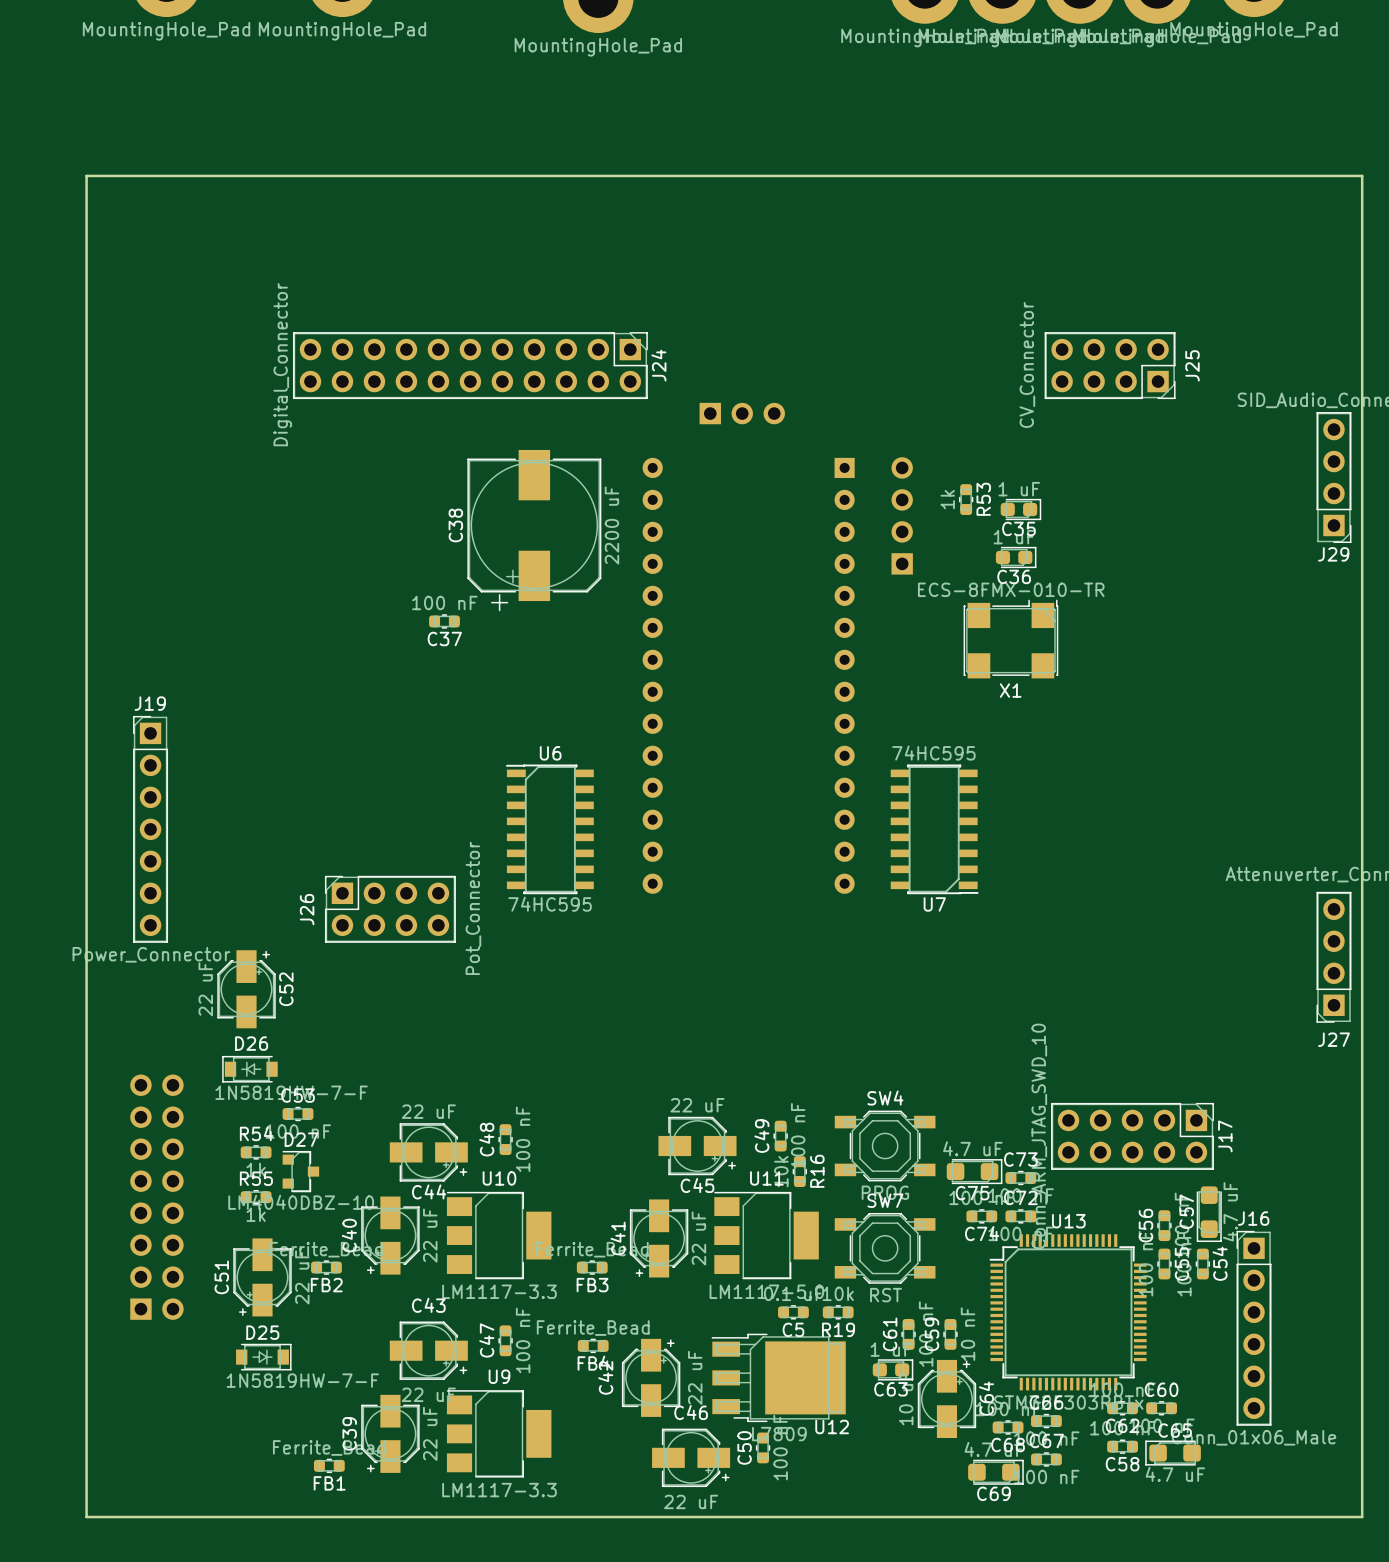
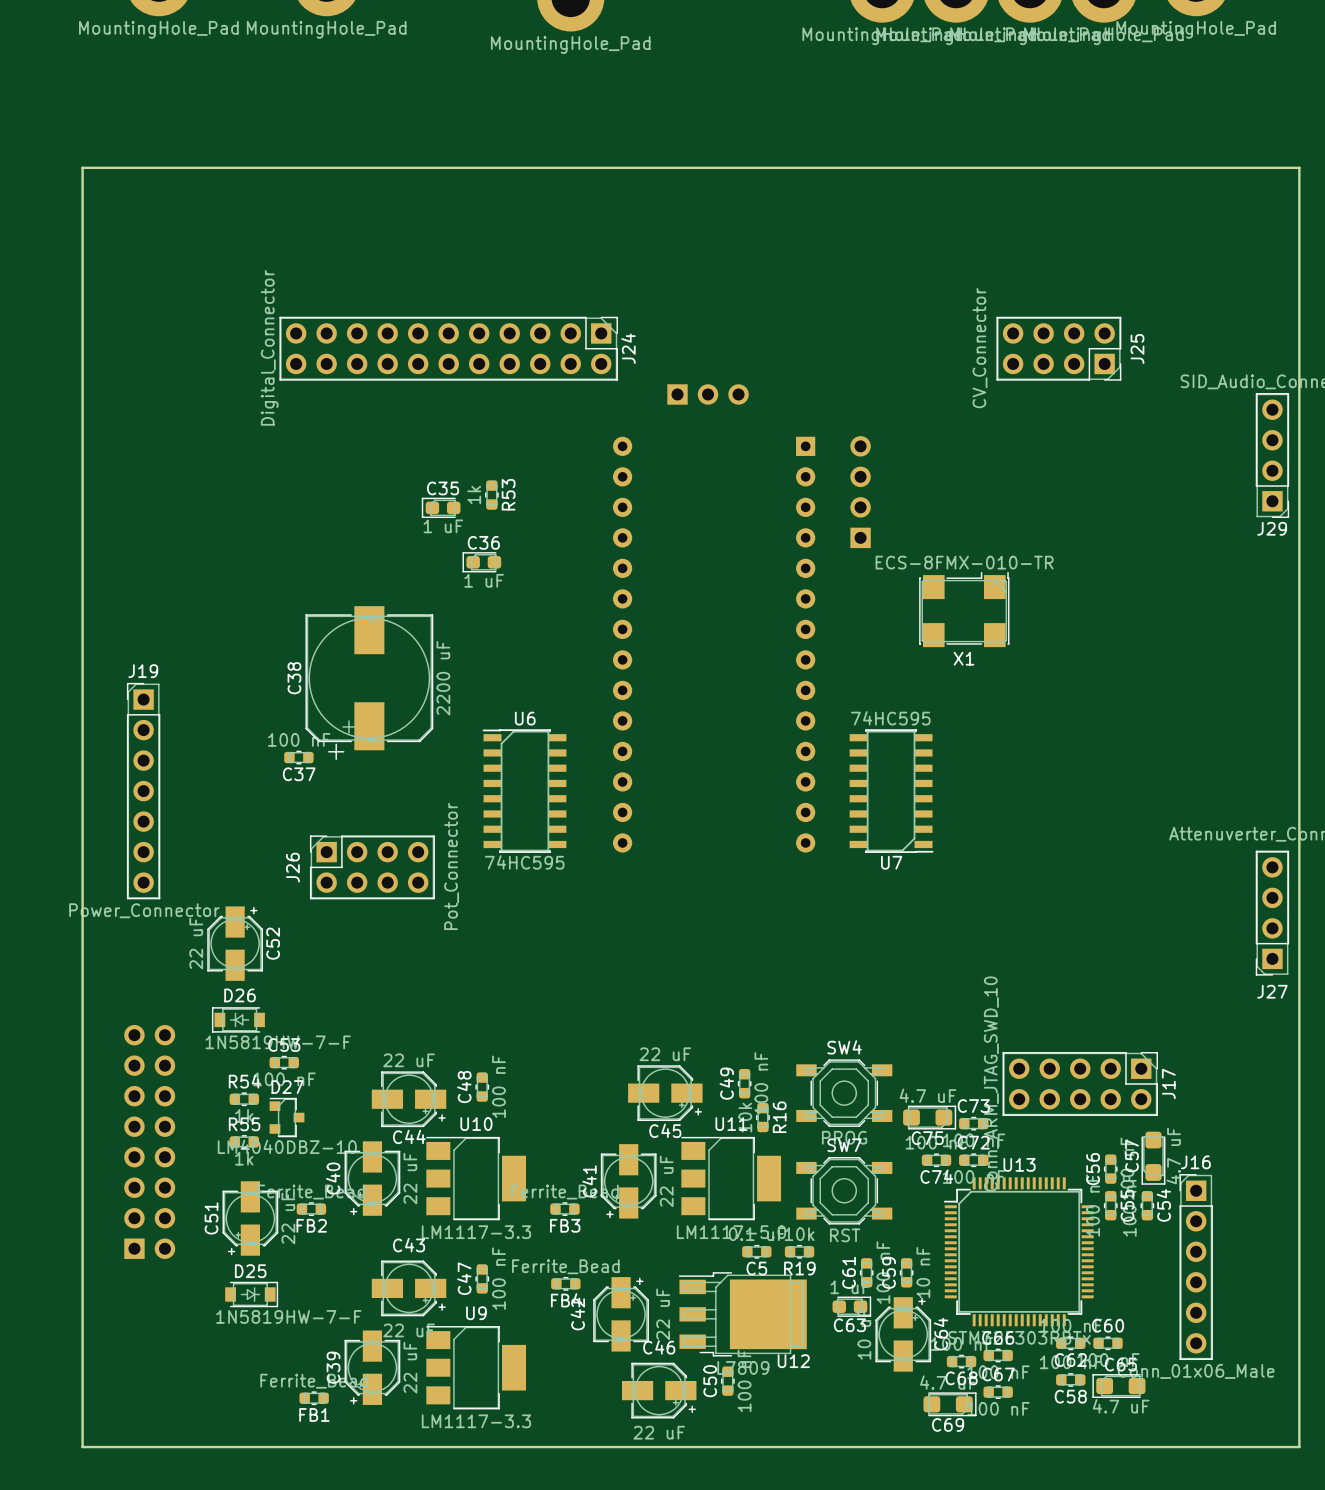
R53 position: (966, 499) -> (491, 495)
C35 rotation: 0° (1020, 509) -> 180° (441, 507)
C35 position: (1020, 509) -> (441, 507)
C38 position: (534, 530) -> (369, 683)
C36 rotation: 0° (1016, 557) -> 180° (481, 562)
C36 position: (1016, 557) -> (481, 562)
C37 position: (444, 621) -> (298, 757)

